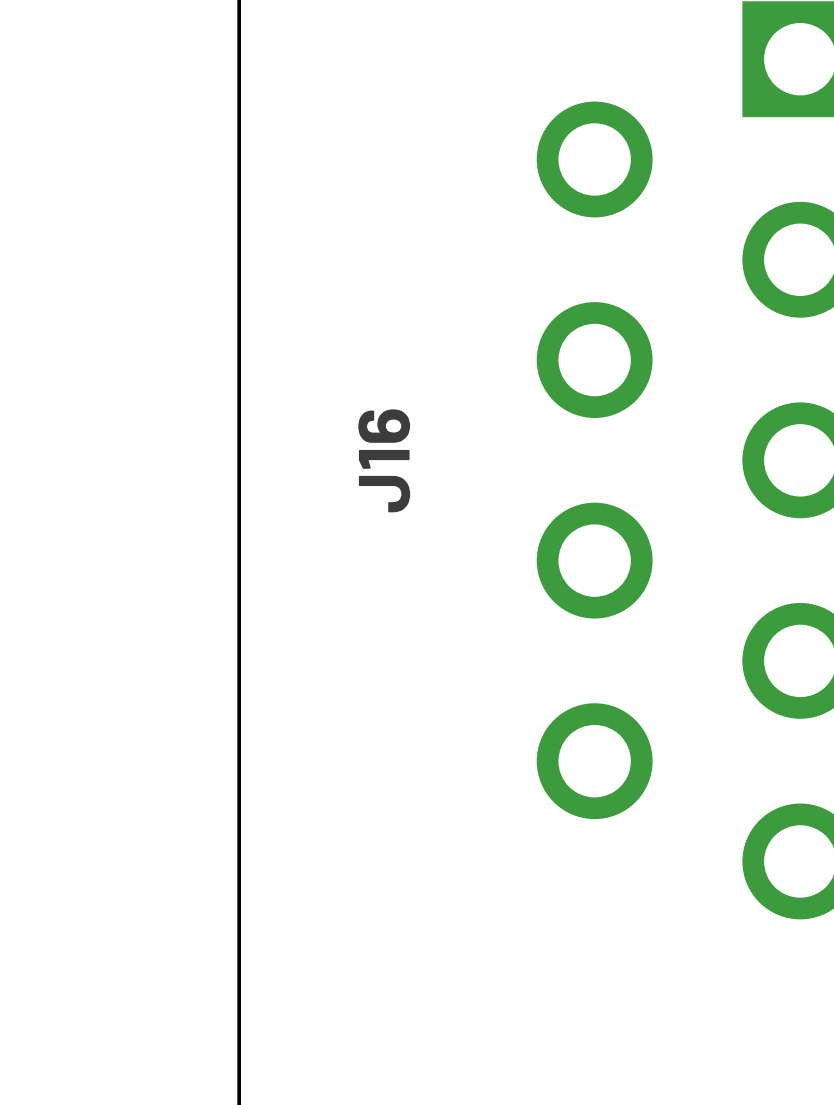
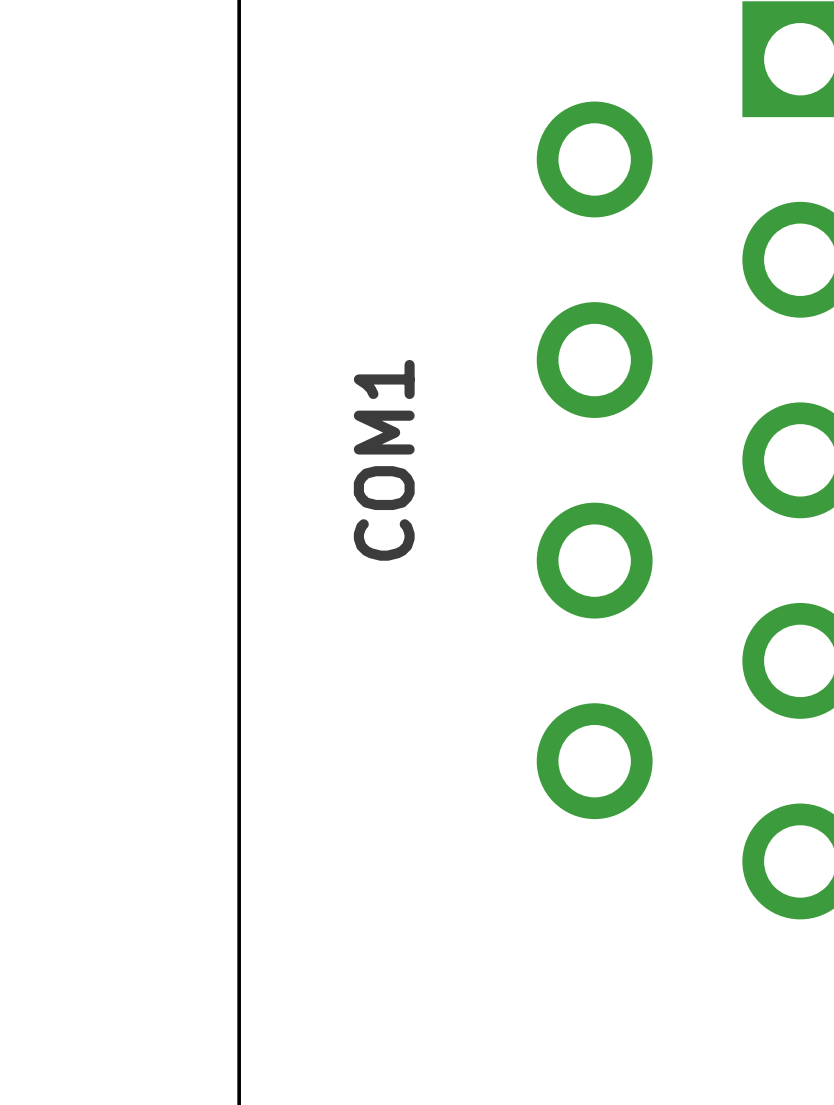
J16 name: J16 (384, 460) -> COM1 (384, 460)

